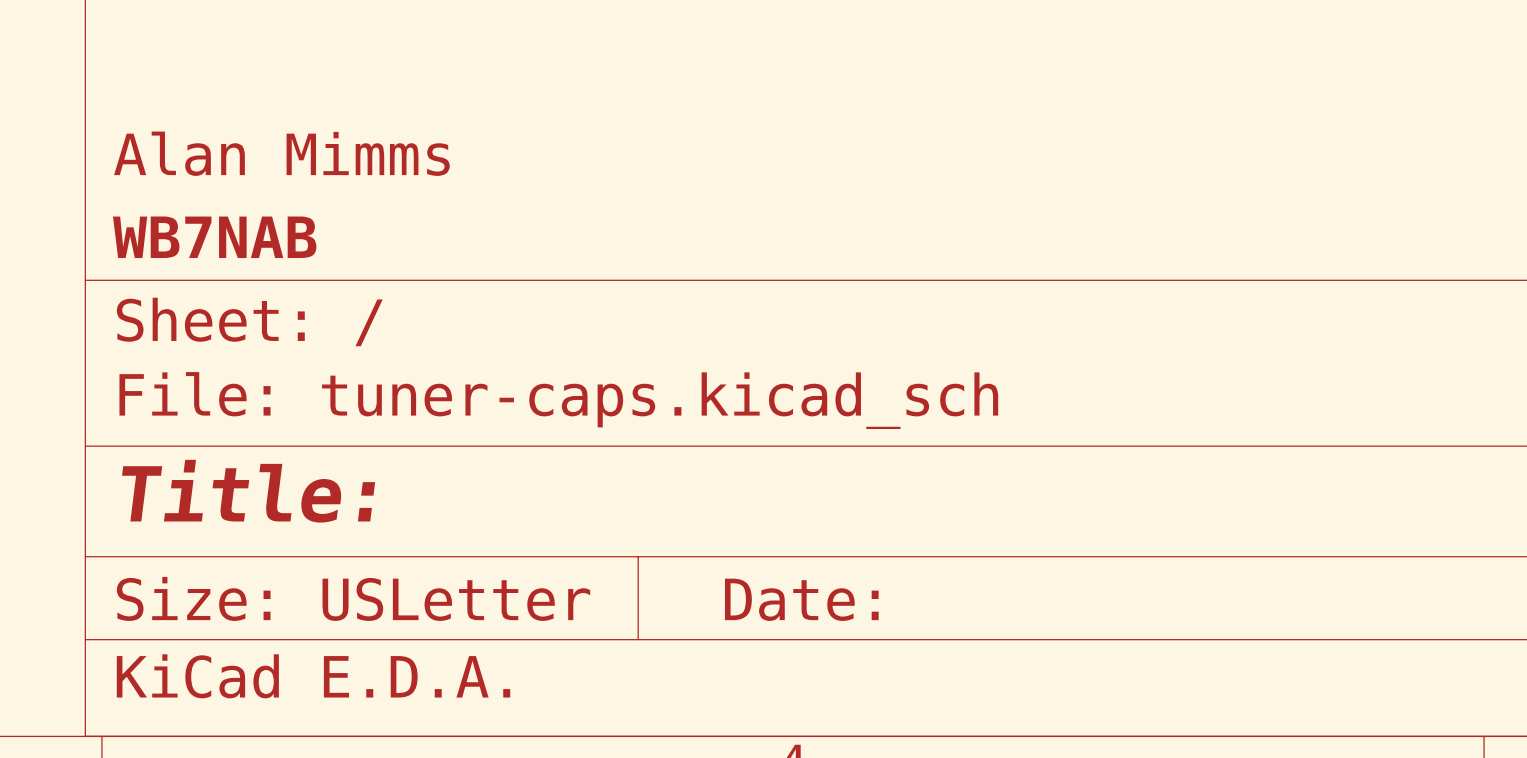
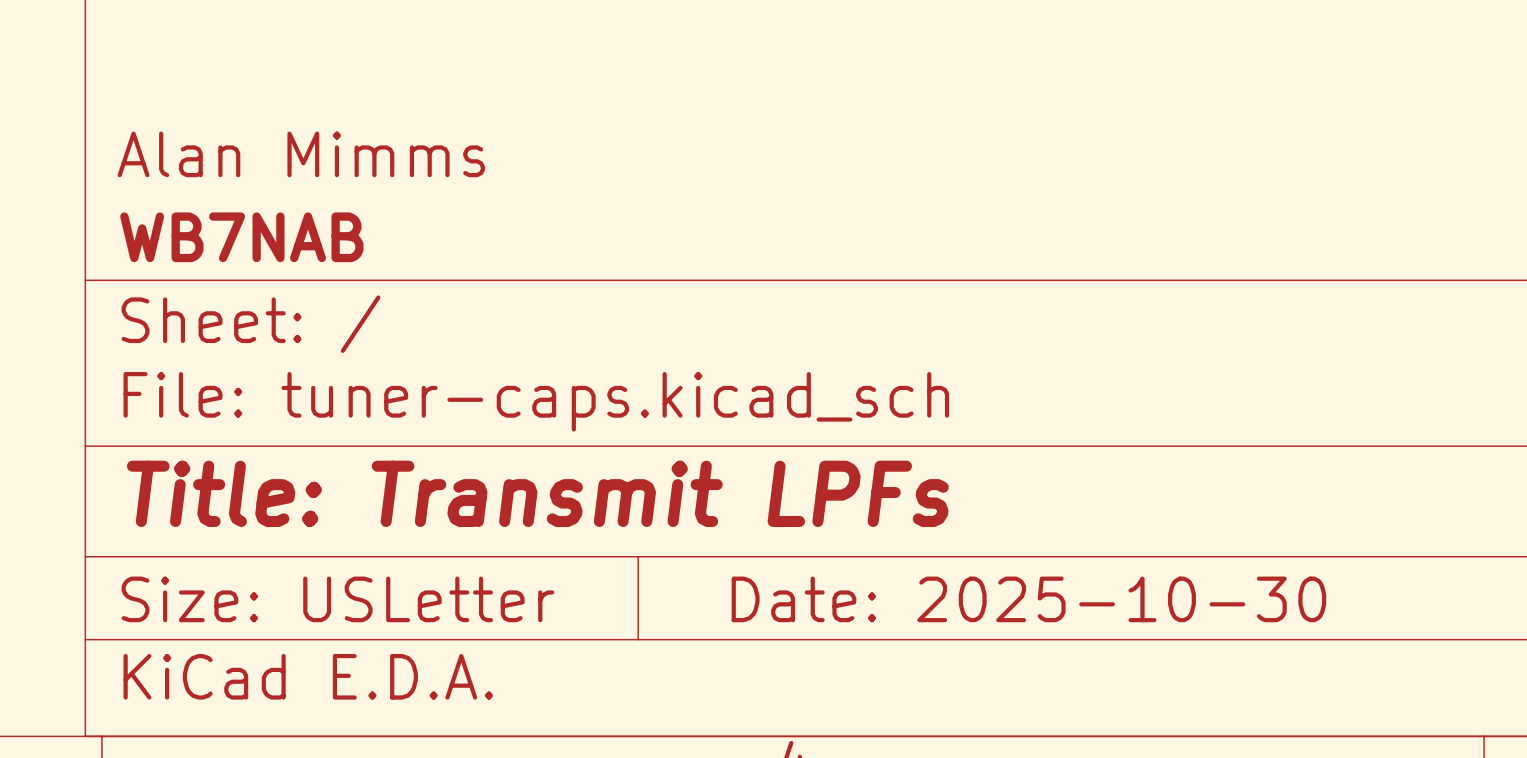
title block: Title: (248, 491) -> Title: Transmit LPFs (537, 493)
title block: Date: (801, 599) -> Date: 2025-10-30 (1028, 599)

